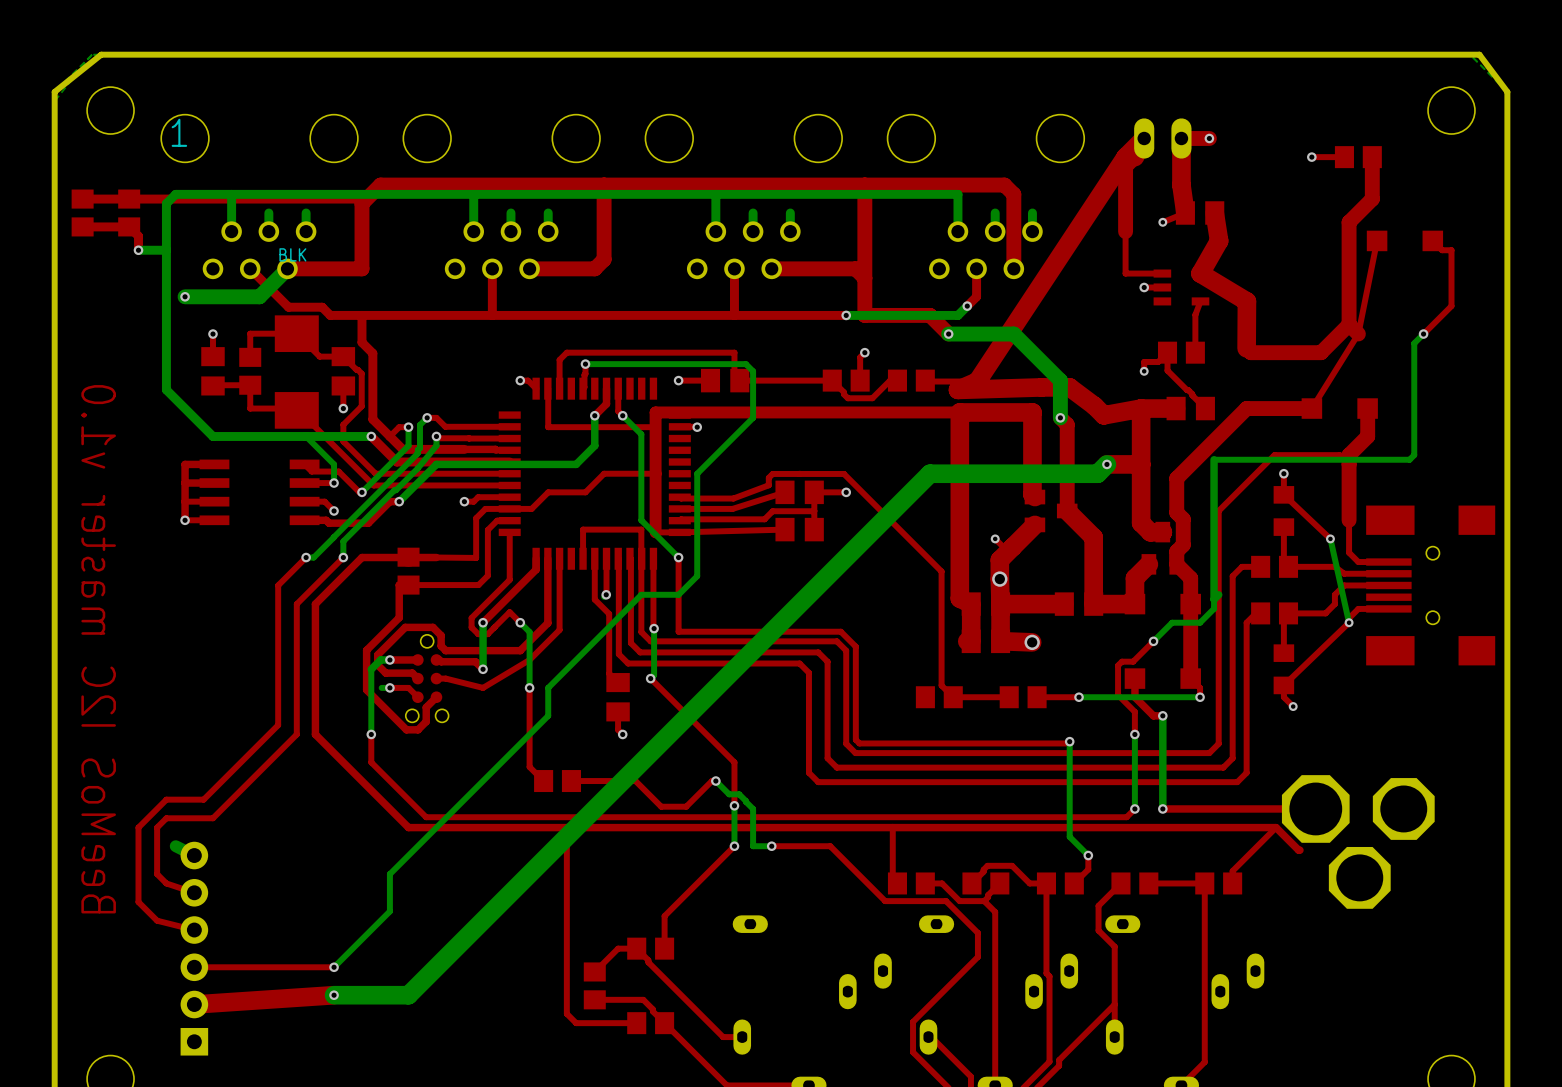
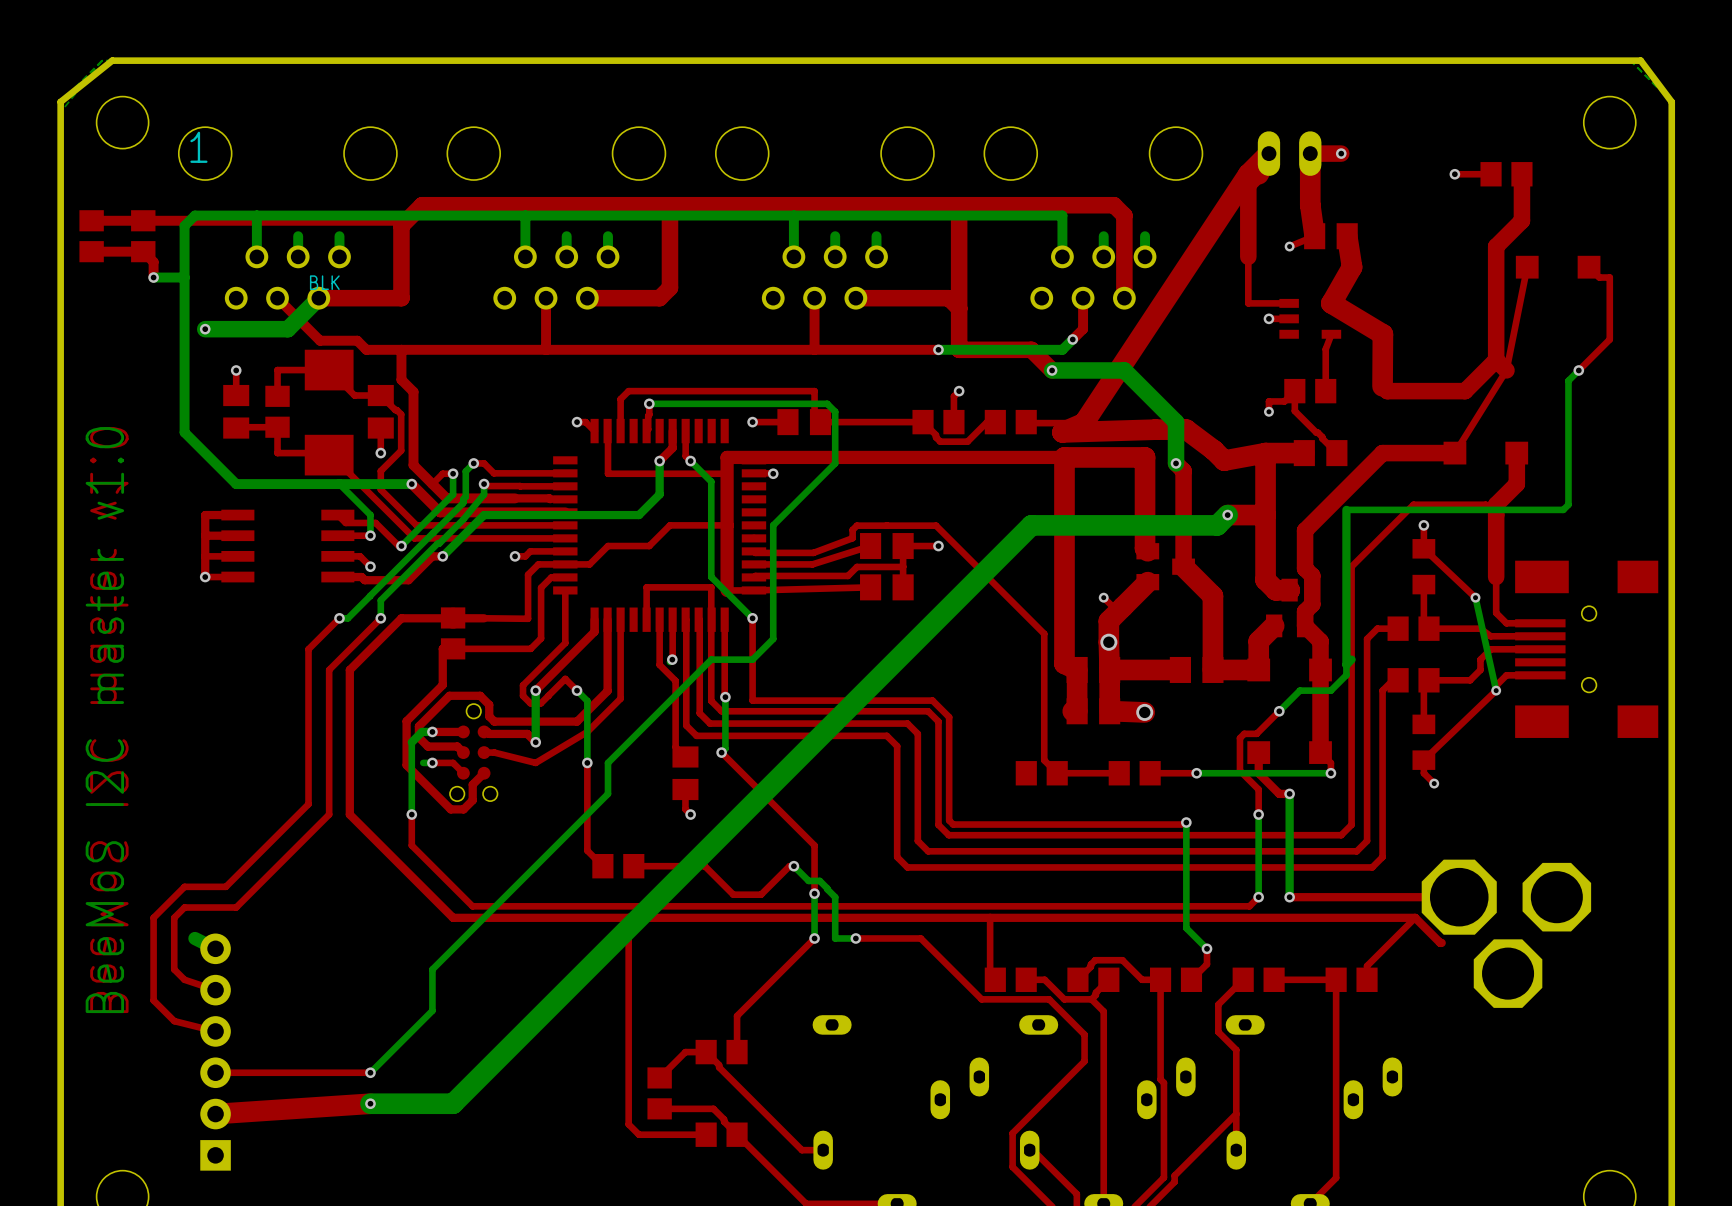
text: none -> BeeMoS I2C master v1.0 (104, 720)

